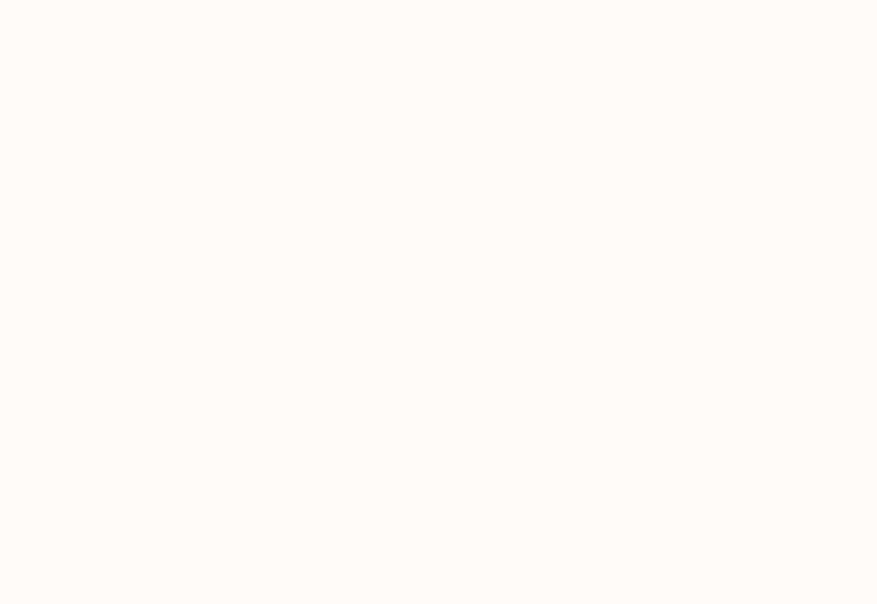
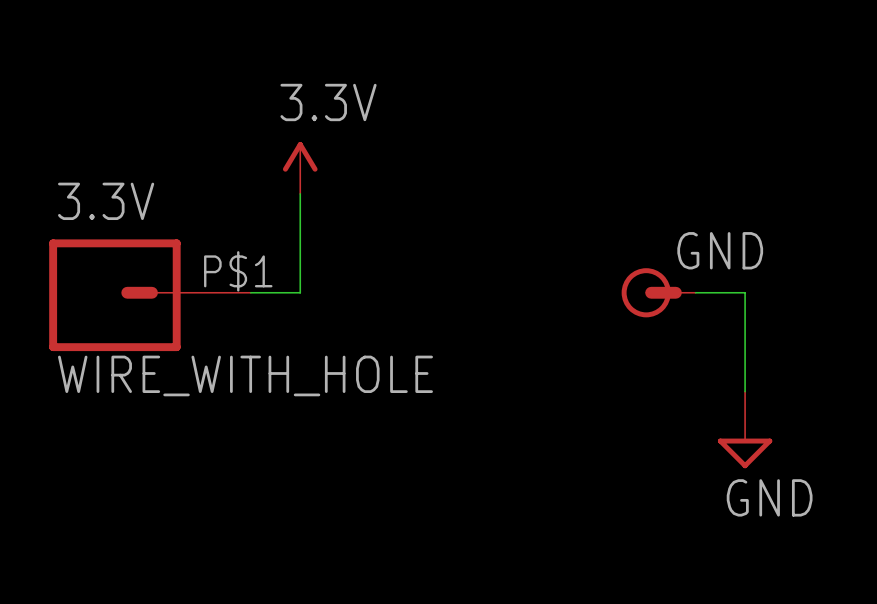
power symbol: none -> 3.3V (300, 167)
wire: none -> (300, 193) (300, 292) (250, 292)
GND: none -> (658, 292)
wire: none -> (695, 292) (745, 292) (745, 391)
3.3V: none -> WIRE_WITH_HOLE (150, 295)
power symbol: none -> GND (745, 429)

